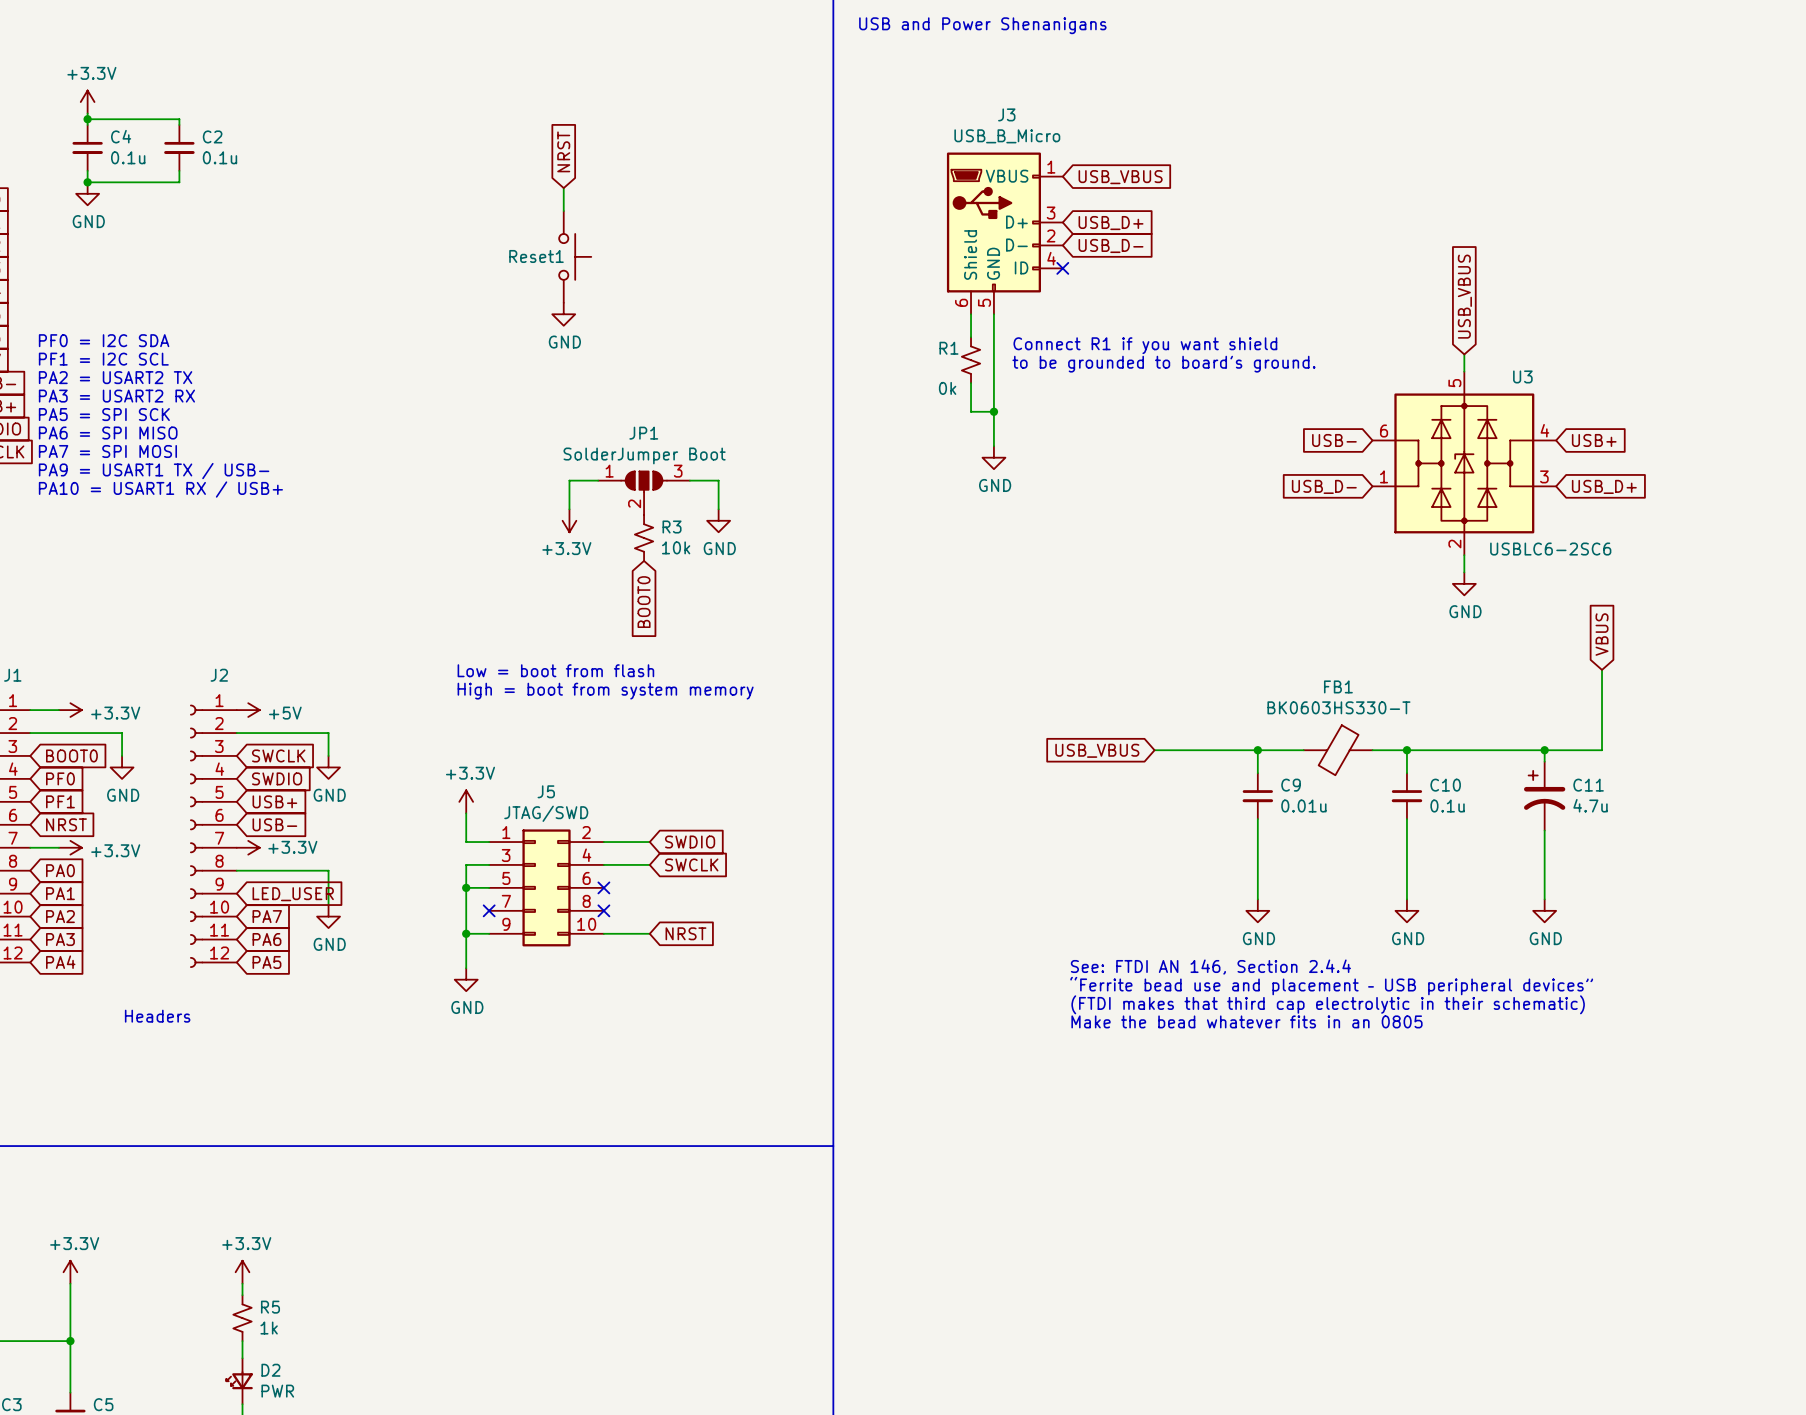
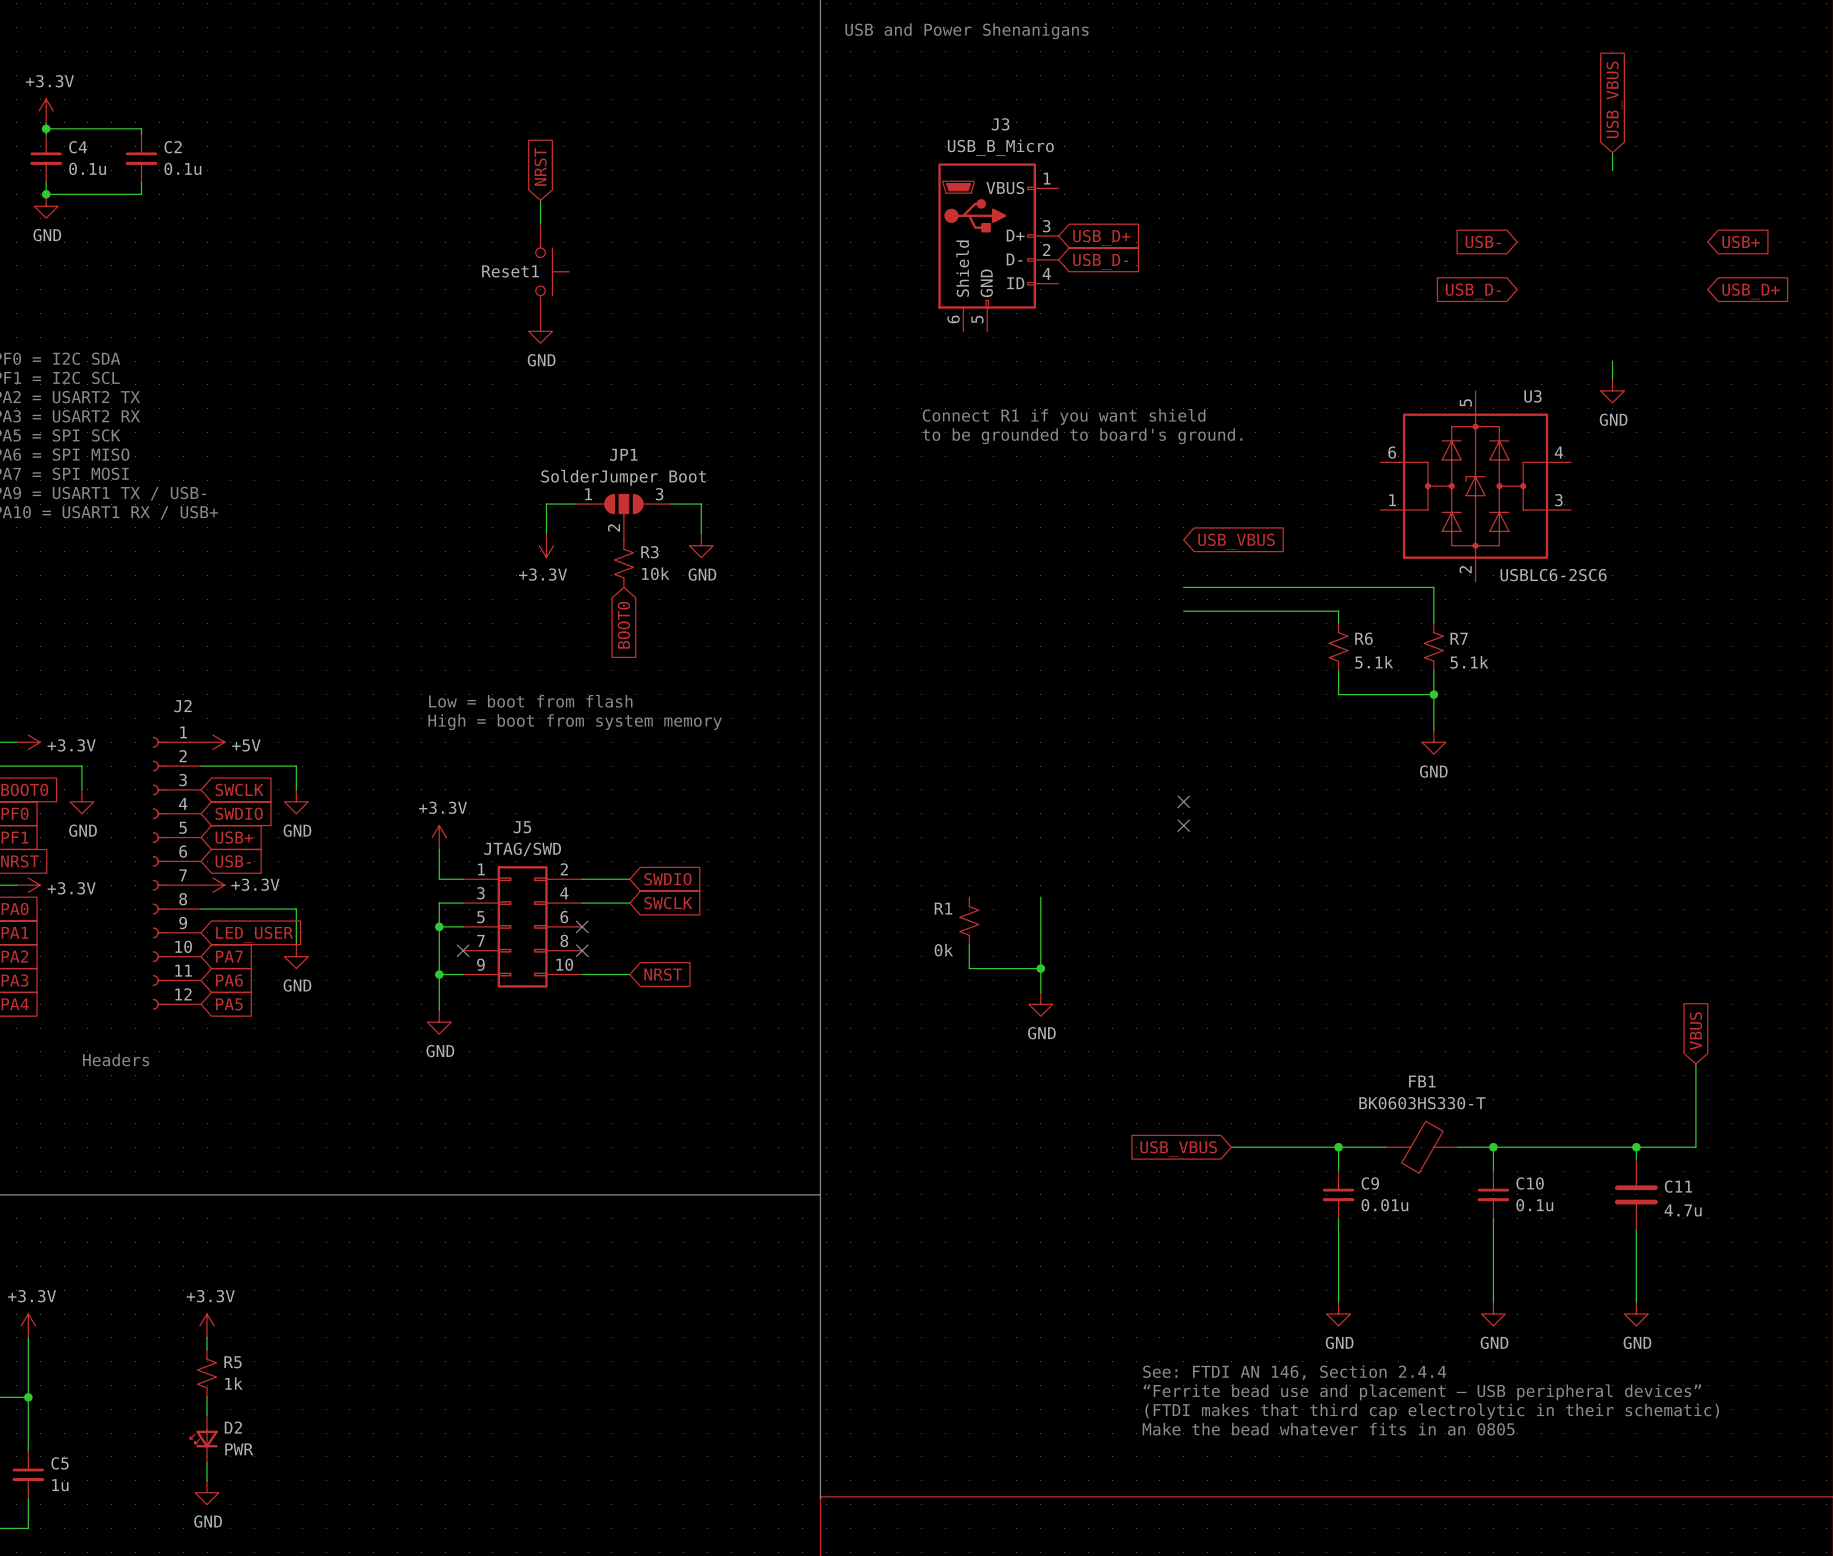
global label: none -> USB_VBUS (1614, 99)
wire: none -> (1612, 152) (1612, 170)
global label: USB_VBUS (1120, 177) -> none
global label: none -> USB- (1483, 242)
global label: none -> USB+ (1741, 242)
no-connect mark: (1062, 268) -> none
global label: none -> USB_D- (1473, 291)
global label: none -> USB_D+ (1750, 291)
global label: USB_VBUS (1464, 296) -> none
wire: (971, 314) (971, 337) -> none
wire: (993, 314) (993, 446) -> none
text position: Connect R1 if you want shield (1145, 345) -> Connect R1 if you want shield (1064, 416)
wire: (1464, 354) (1464, 371) -> (1612, 361) (1612, 378)
R1 position: (971, 360) -> (969, 920)
text position: to be grounded to board's ground. (1163, 364) -> to be grounded to board's ground. (1082, 436)
power symbol: none -> GND (1612, 390)
wire: (971, 383) (971, 411) (993, 411) -> none
junction: (993, 411) -> none
global label: USB- (1334, 440) -> none
global label: USB+ (1594, 440) -> none
power symbol: GND (993, 457) -> none
global label: USB_D- (1324, 486) -> none
global label: USB_D+ (1604, 486) -> none
global label: none -> USB_VBUS (1236, 541)
wire: (1464, 555) (1464, 572) -> none
wire: none -> (1183, 587) (1433, 587) (1433, 623)
wire: none -> (1183, 611) (1338, 611) (1338, 623)
power symbol: GND (1464, 583) -> none
R6: none -> 5.1k (1338, 646)
R7: none -> 5.1k (1433, 646)
global label: VBUS (1602, 634) -> none
wire: none -> (1338, 670) (1338, 694) (1433, 694)
wire: none -> (1433, 670) (1433, 730)
junction: none -> (1433, 694)
wire: (1602, 669) (1602, 750) (1372, 750) -> none
power symbol: none -> GND (1433, 742)
global label: USB_VBUS (1097, 750) -> none
wire: (1154, 750) (1303, 750) -> none
wire: (1257, 750) (1257, 773) -> none
junction: (1257, 750) -> none
FB1 position: (1338, 750) -> (1421, 1147)
wire: (1406, 750) (1406, 773) -> none
junction: (1406, 750) -> none
wire: (1544, 750) (1544, 761) -> none
junction: (1544, 750) -> none
C11 symbol: [1523, 761, 1566, 831] -> [1614, 1159, 1658, 1231]
no-connect mark: none -> (1183, 801)
no-connect mark: none -> (1183, 825)
C9 position: (1257, 796) -> (1338, 1194)
C10 position: (1406, 796) -> (1493, 1194)
wire: (1257, 819) (1257, 899) -> none
wire: (1406, 819) (1406, 899) -> none
wire: (1544, 830) (1544, 899) -> none
wire: none -> (1040, 897) (1040, 992)
wire: none -> (969, 944) (969, 968) (1040, 968)
power symbol: GND (1257, 910) -> none
power symbol: GND (1406, 910) -> none
power symbol: GND (1544, 910) -> none
junction: none -> (1040, 968)
power symbol: none -> GND (1040, 1004)
text: See: FTDI AN 146, Section 2.4.4 (1210, 967) -> none
global label: none -> VBUS (1695, 1031)
text: “Ferrite bead use and placement – USB peripheral devices” (1331, 986) -> none
text: (FTDI makes that third cap electrolytic in their schematic) (1328, 1004) -> none
wire: none -> (1695, 1063) (1695, 1147) (1457, 1147)
text: Make the bead whatever fits in an 0805 (1246, 1021) -> none
global label: none -> USB_VBUS (1178, 1149)
wire: none -> (1231, 1147) (1386, 1147)
wire: none -> (1338, 1147) (1338, 1171)
junction: none -> (1338, 1147)
wire: none -> (1493, 1147) (1493, 1171)
junction: none -> (1493, 1147)
wire: none -> (1636, 1147) (1636, 1159)
junction: none -> (1636, 1147)
wire: none -> (1338, 1218) (1338, 1302)
wire: none -> (1493, 1218) (1493, 1302)
wire: none -> (1636, 1230) (1636, 1302)
power symbol: none -> GND (1338, 1314)
power symbol: none -> GND (1493, 1314)
power symbol: none -> GND (1636, 1314)
text: none -> See: FTDI AN 146, Section 2.4.4 (1294, 1372)
text: none -> “Ferrite bead use and placement – USB peripheral devices” (1422, 1392)
text: none -> (FTDI makes that third cap electrolytic in their schematic) (1432, 1411)
text: none -> Make the bead whatever fits in an 0805 (1328, 1429)

